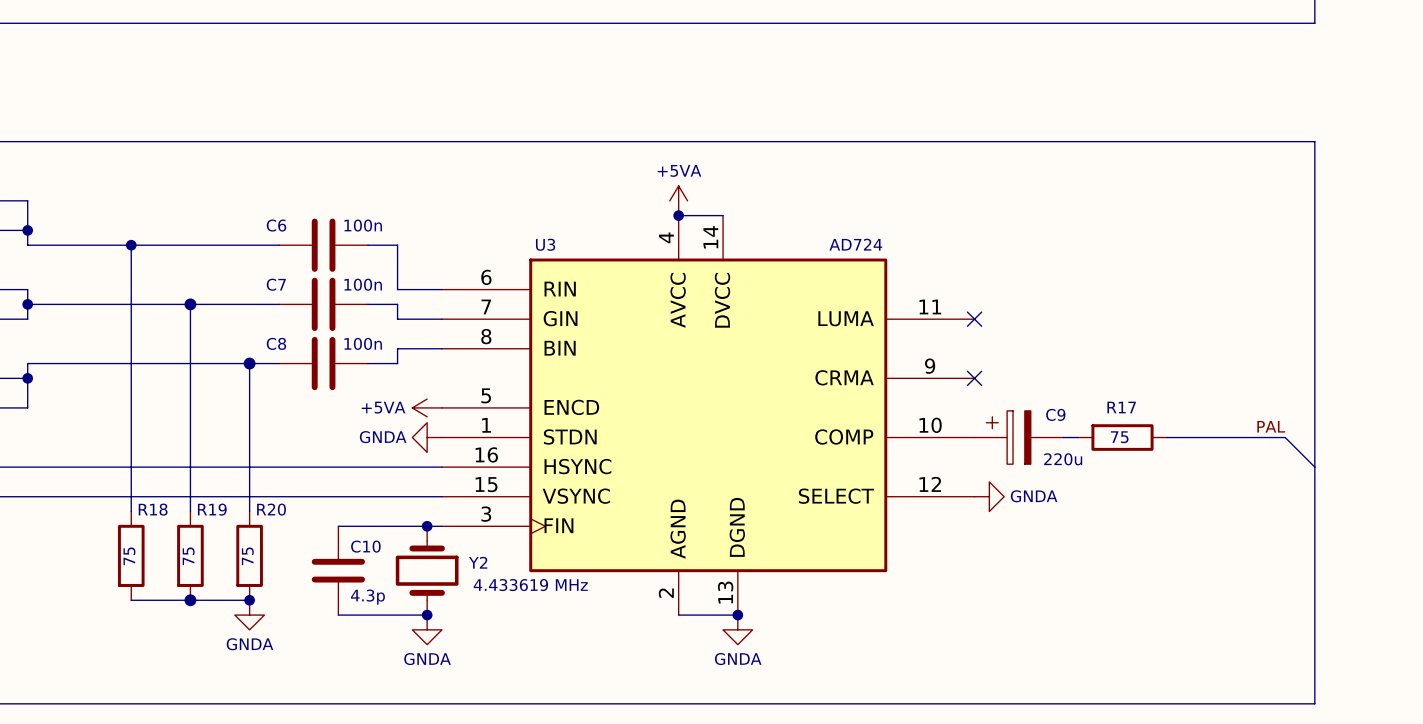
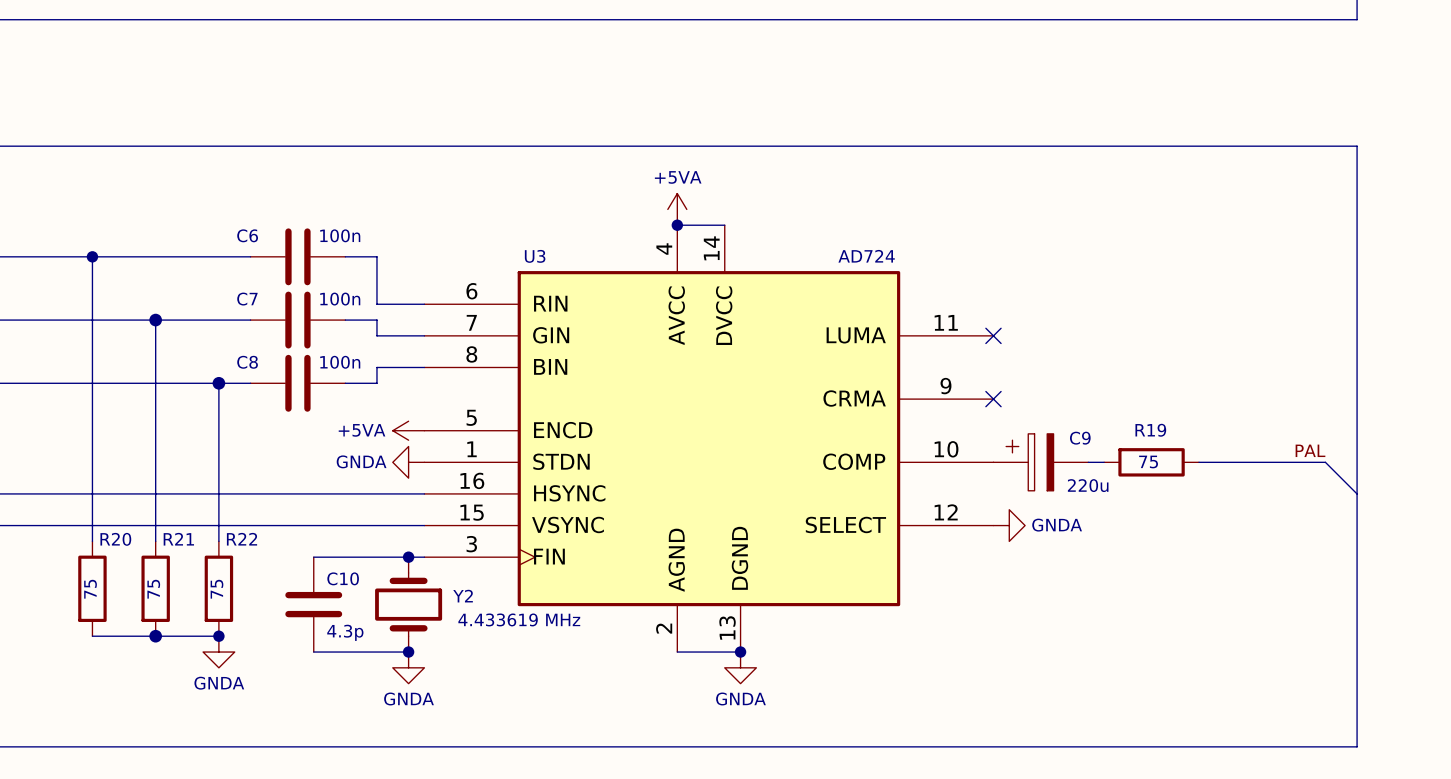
R17 name: R17 (1121, 407) -> R19 (1150, 430)
R18 name: R18 (153, 509) -> R20 (115, 539)
R19 name: R19 (212, 509) -> R21 (178, 539)
R20 name: R20 (271, 509) -> R22 (242, 539)

